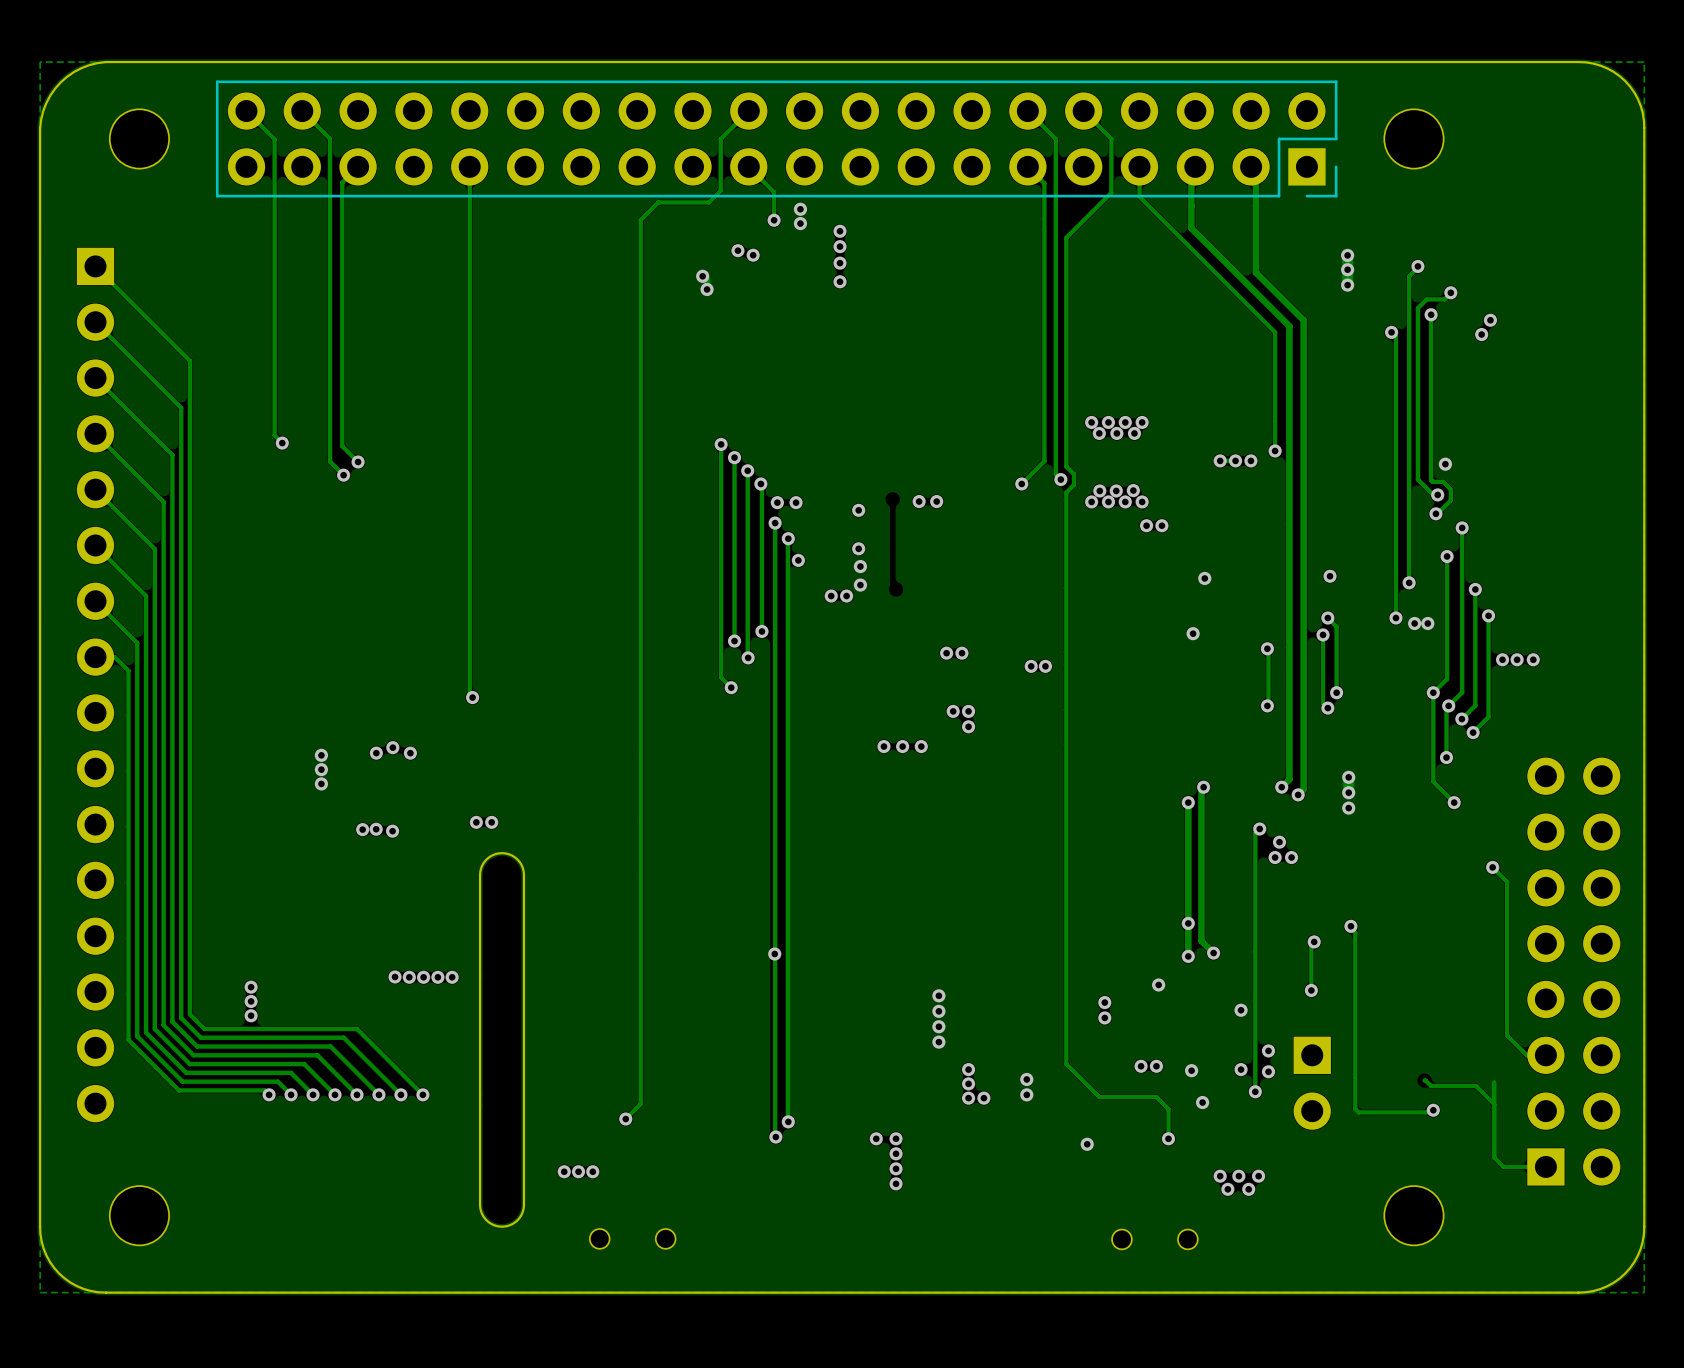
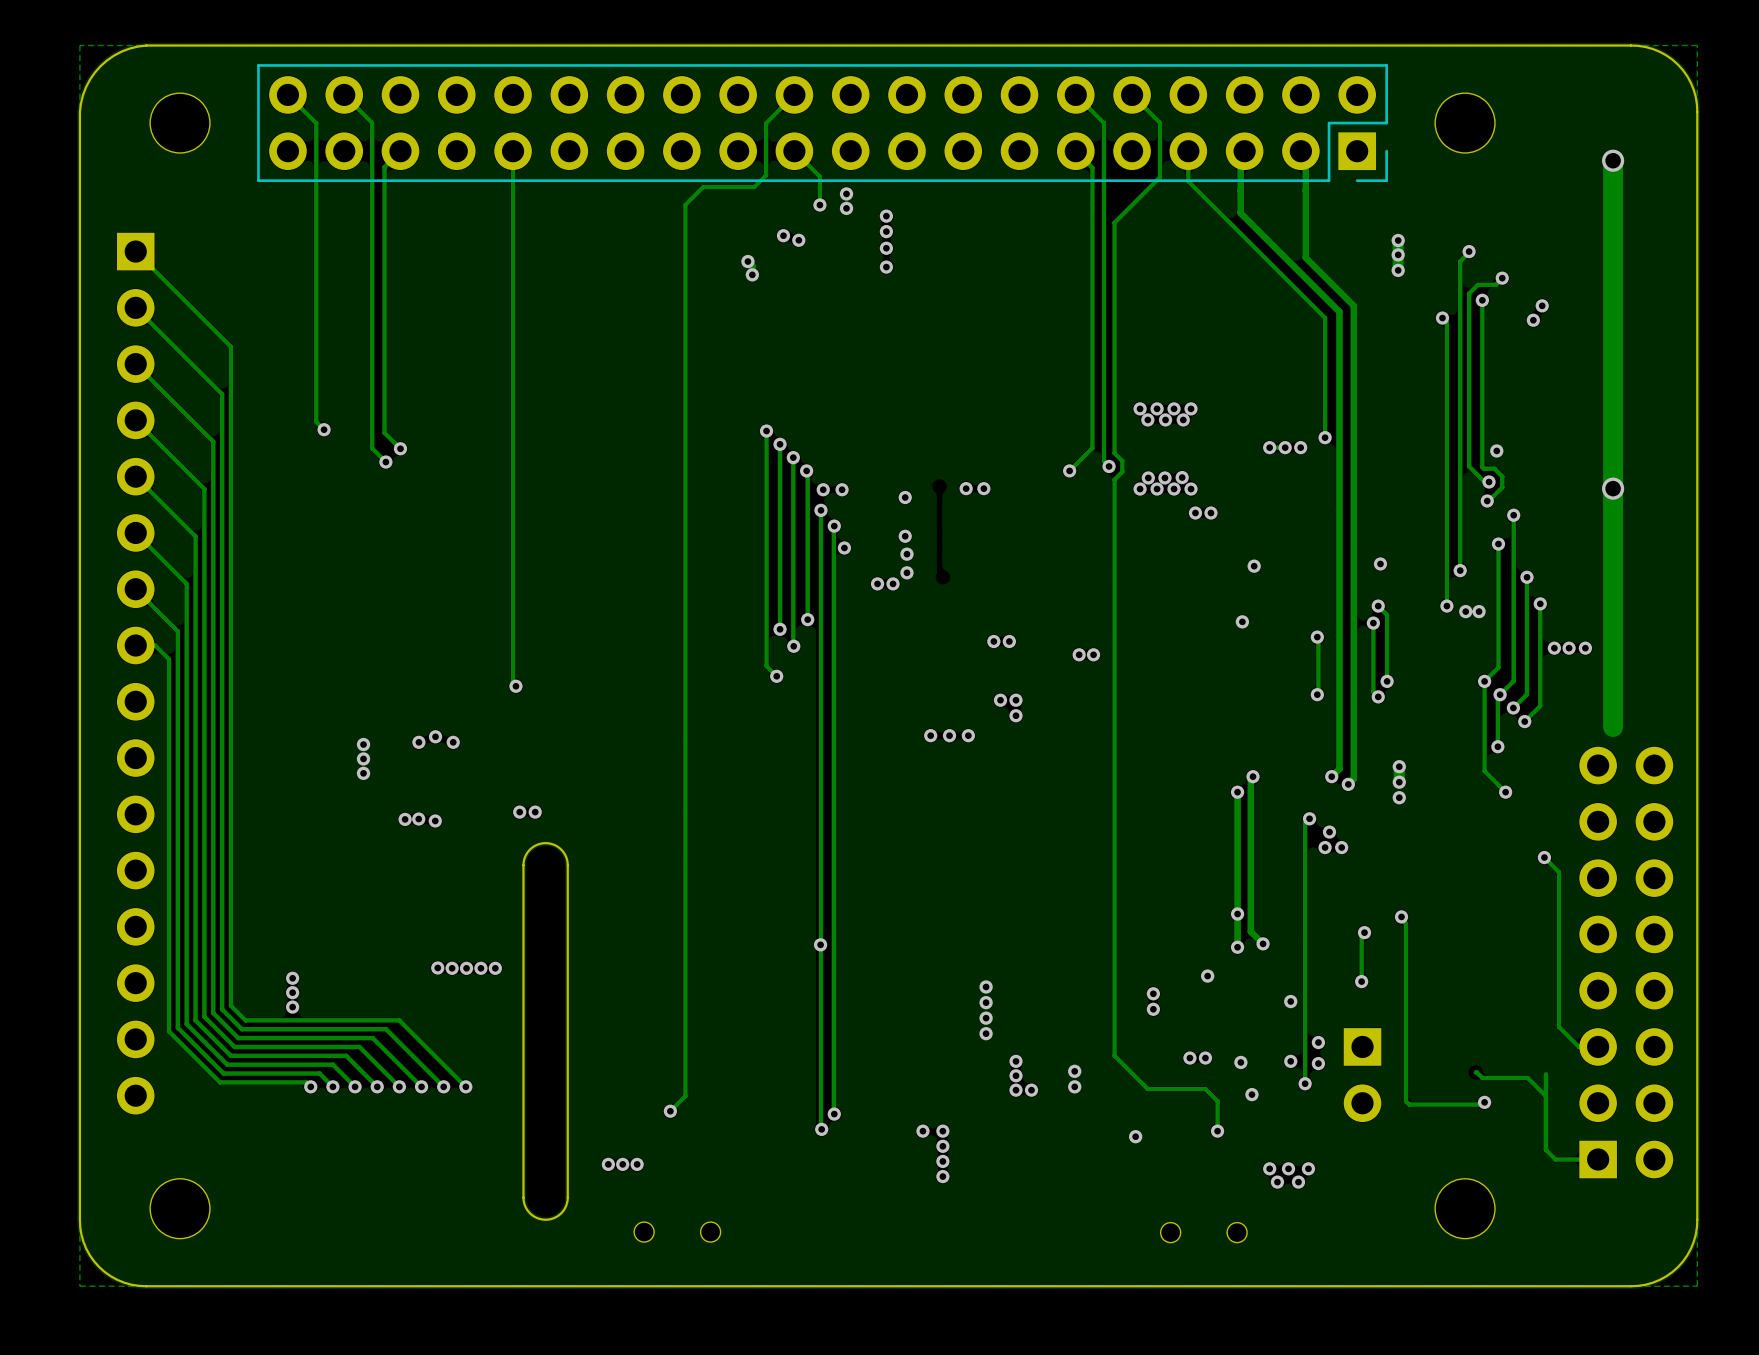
track: none -> (1613, 160) (1613, 727)
via: none -> (1613, 160)
via: none -> (1613, 488)

